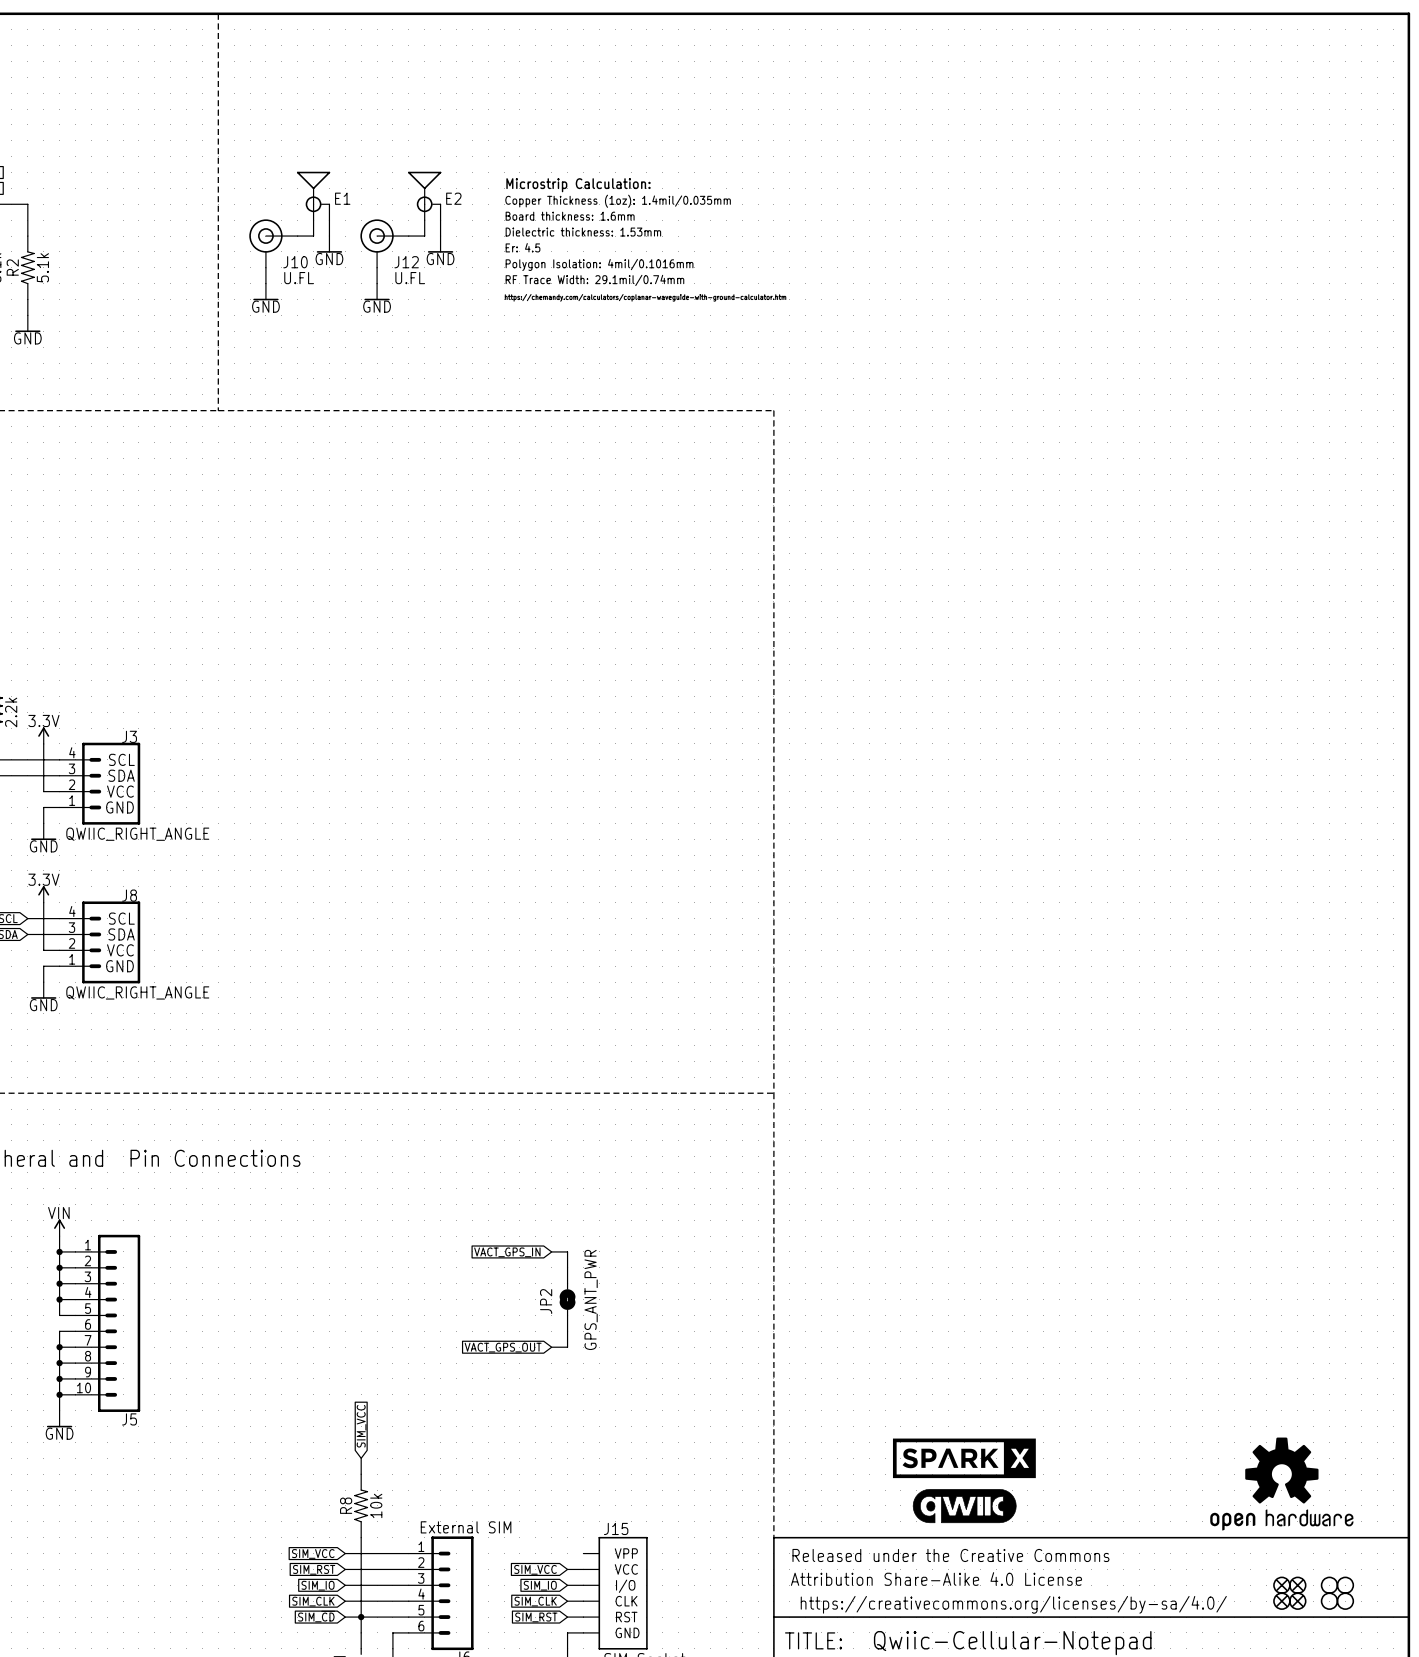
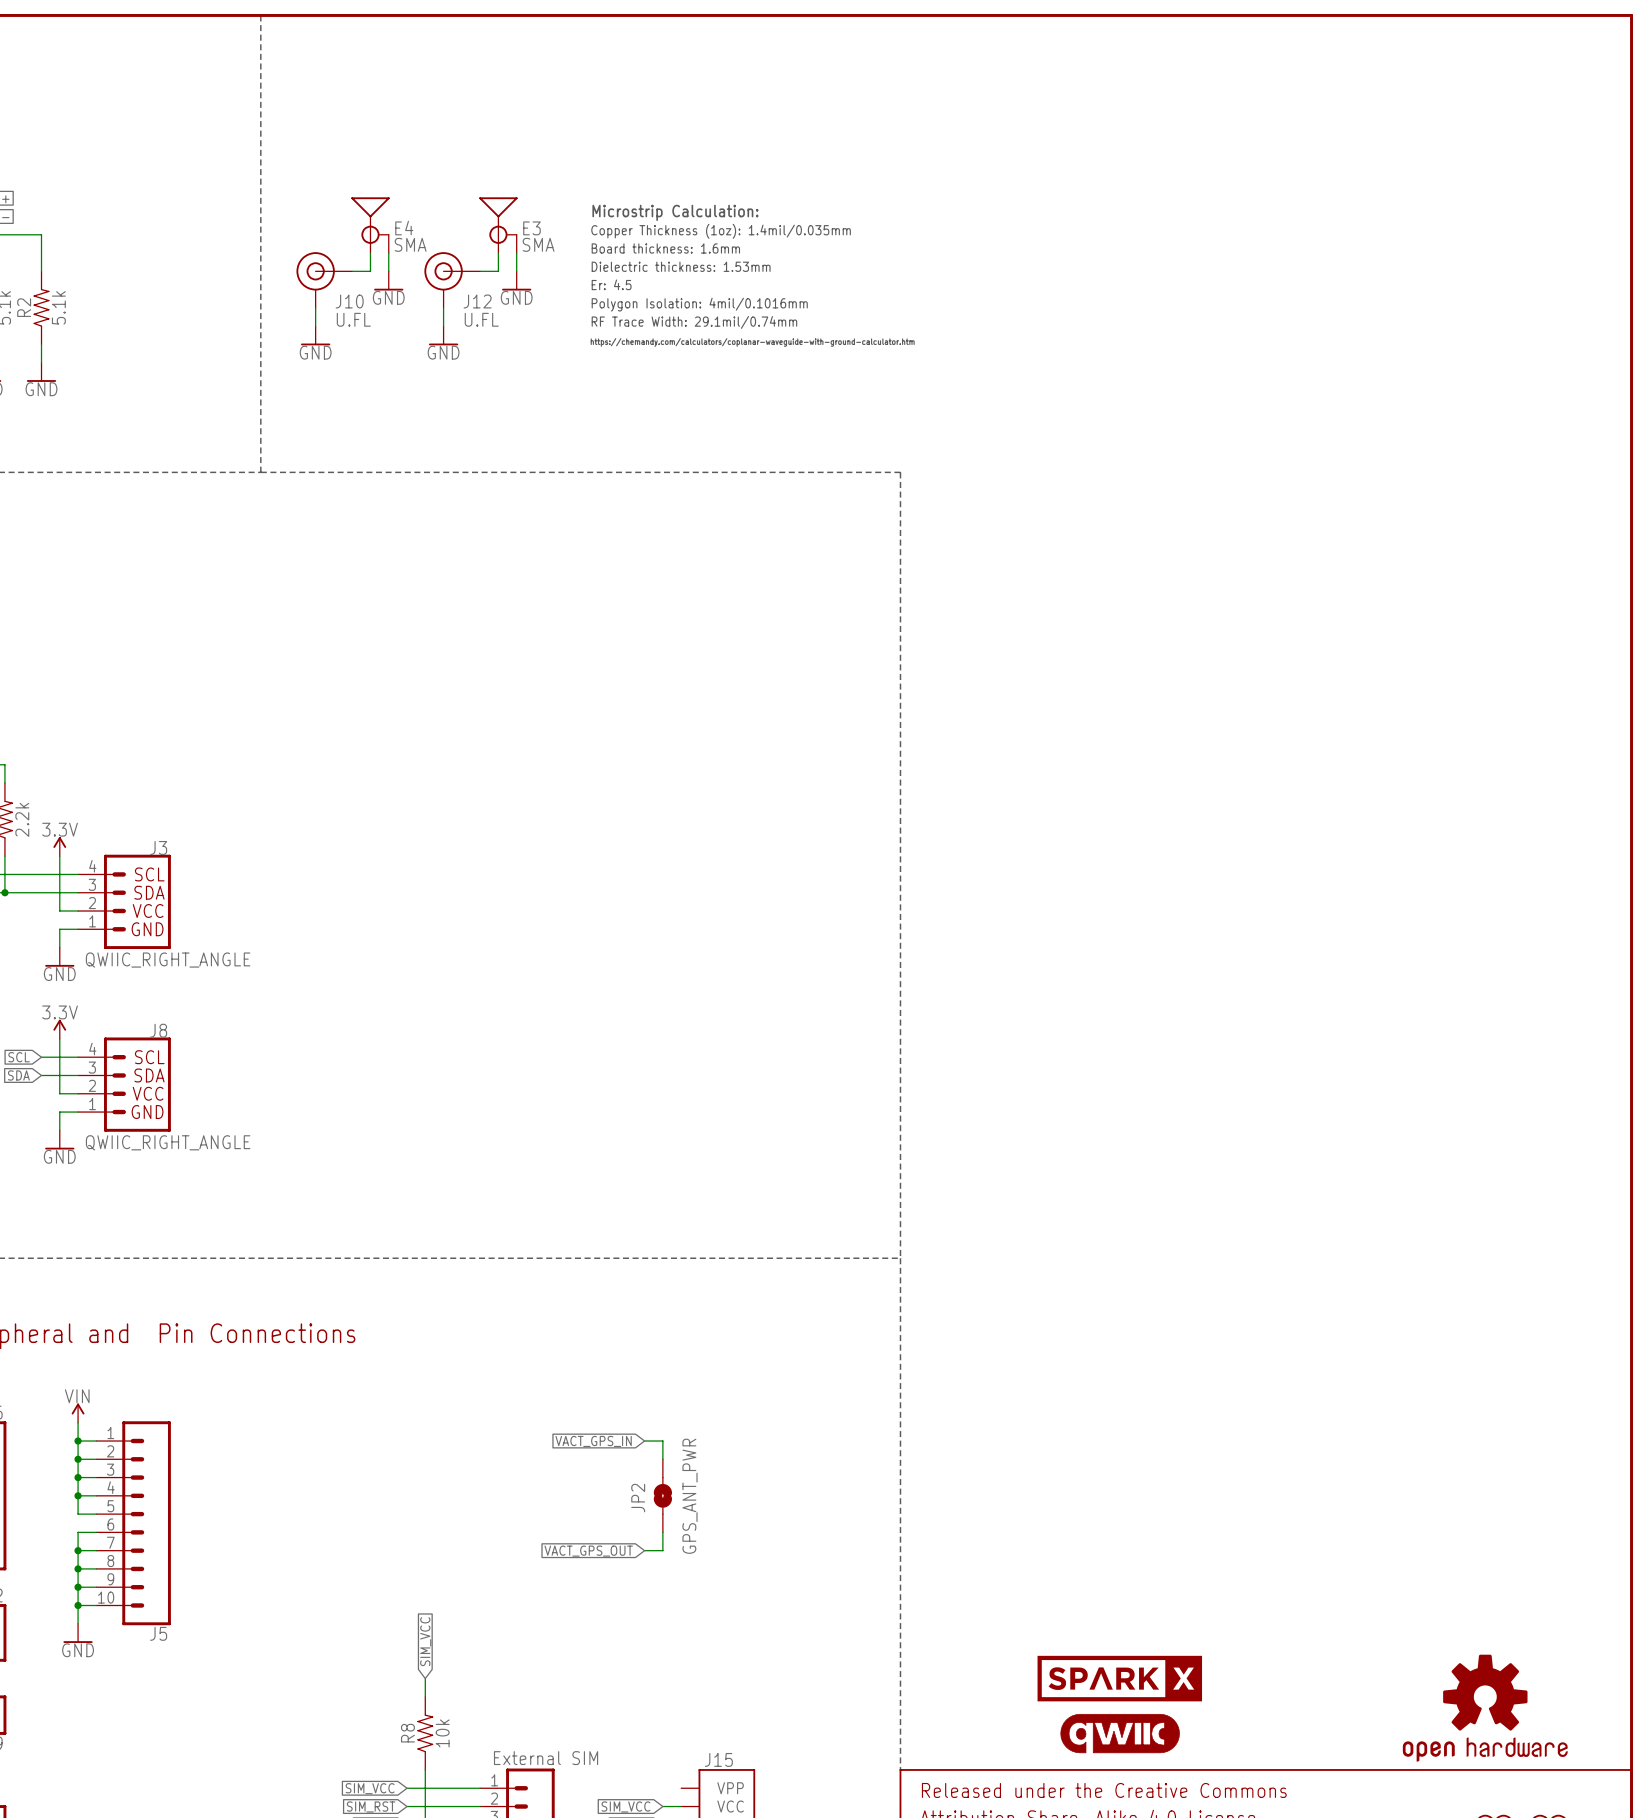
E1 name: E1 (342, 198) -> E4 (404, 228)
E2 name: E2 (453, 198) -> E3 (531, 228)
E1 value: none -> SMA (410, 244)
E2 value: none -> SMA (538, 244)

